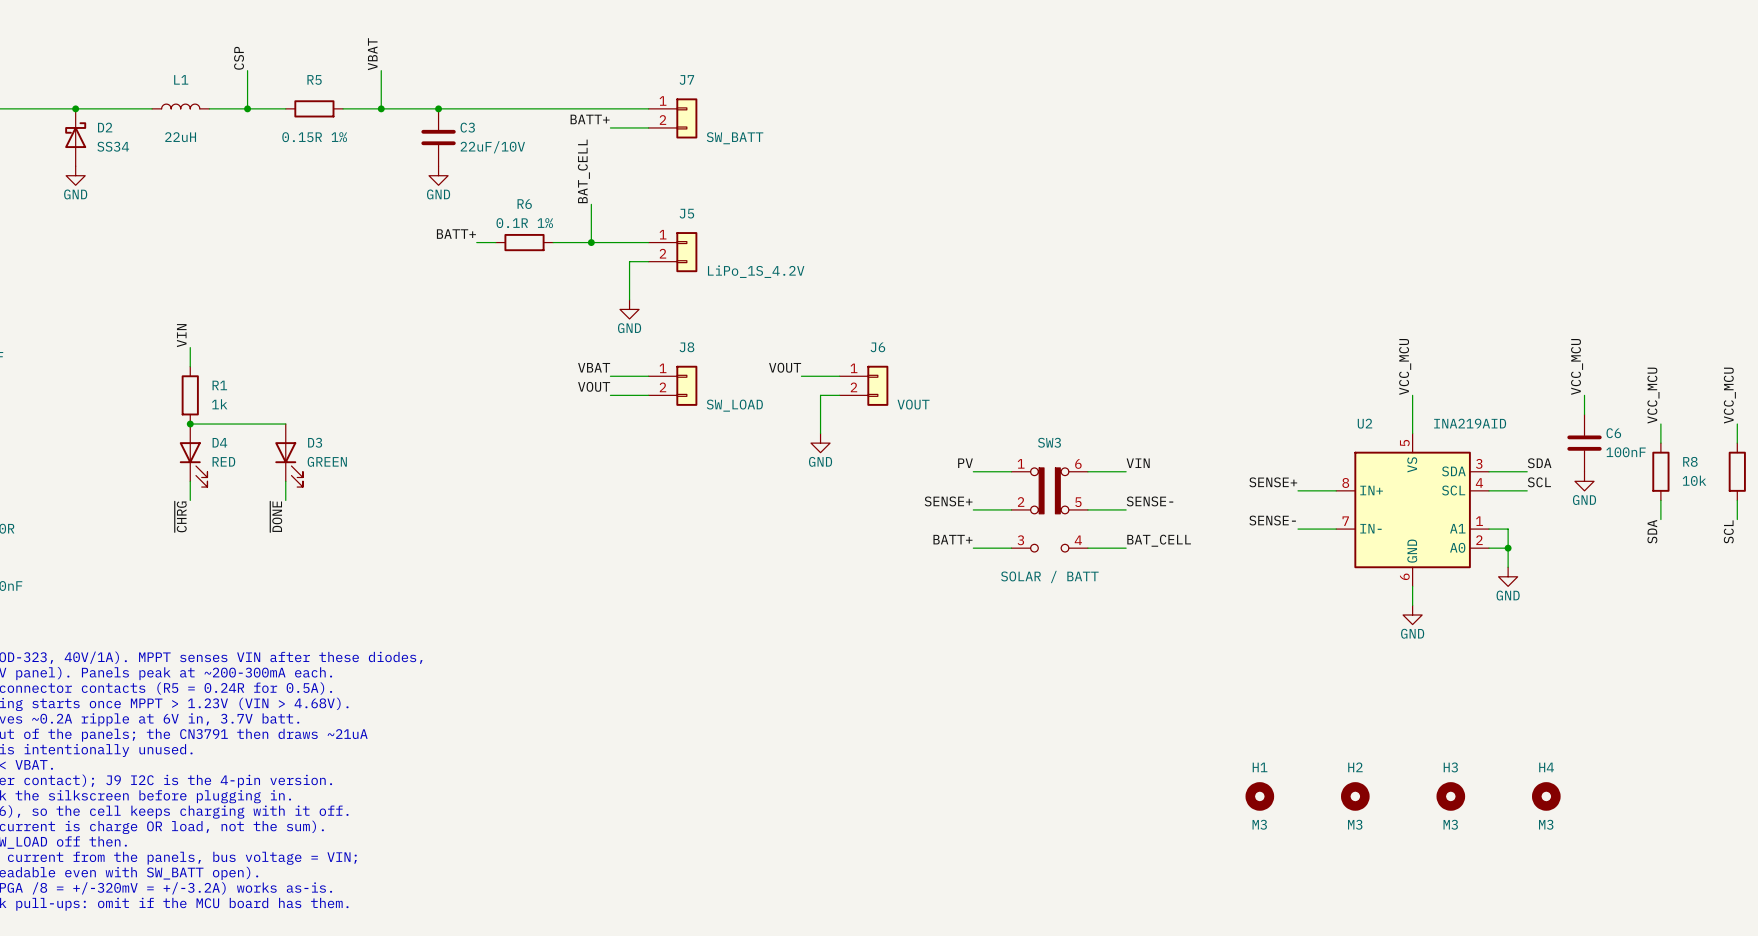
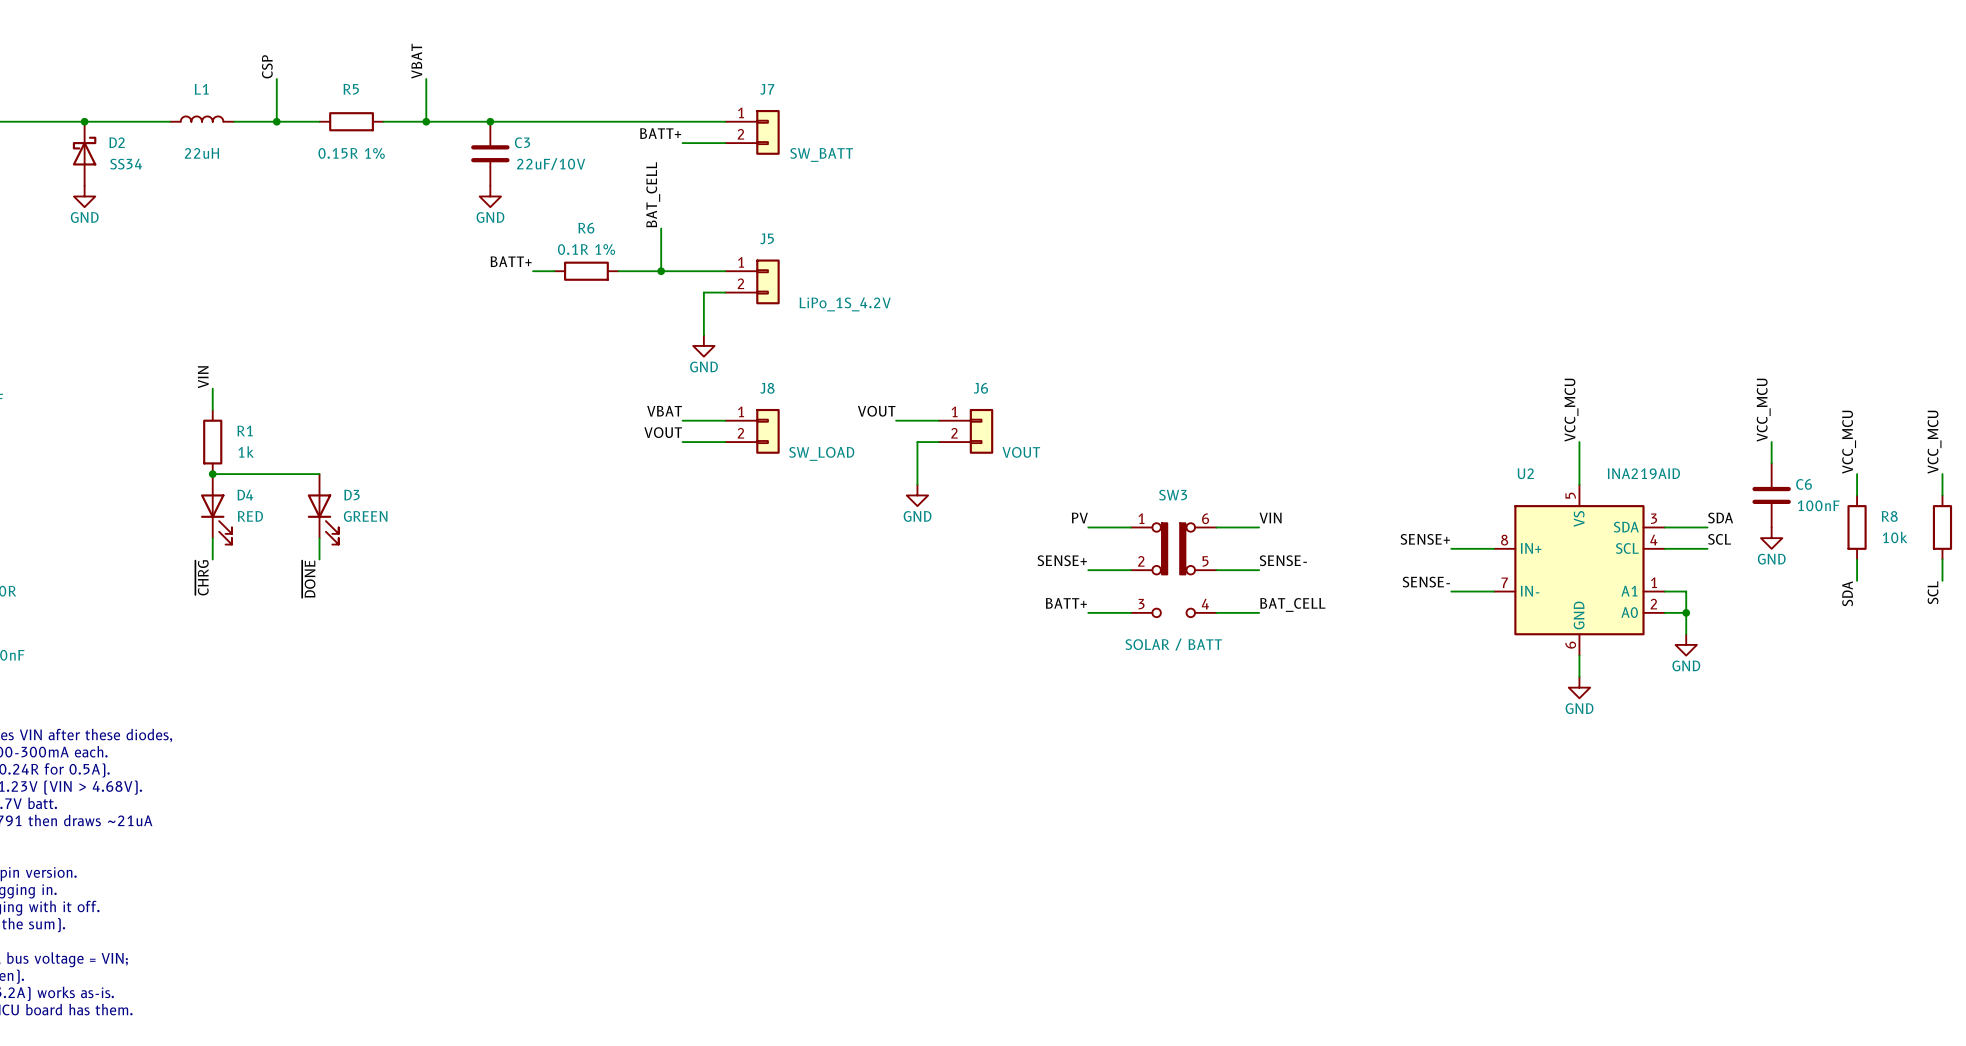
H1: M3 (1259, 796) -> none
H2: M3 (1355, 796) -> none
H3: M3 (1450, 796) -> none
H4: M3 (1546, 796) -> none

